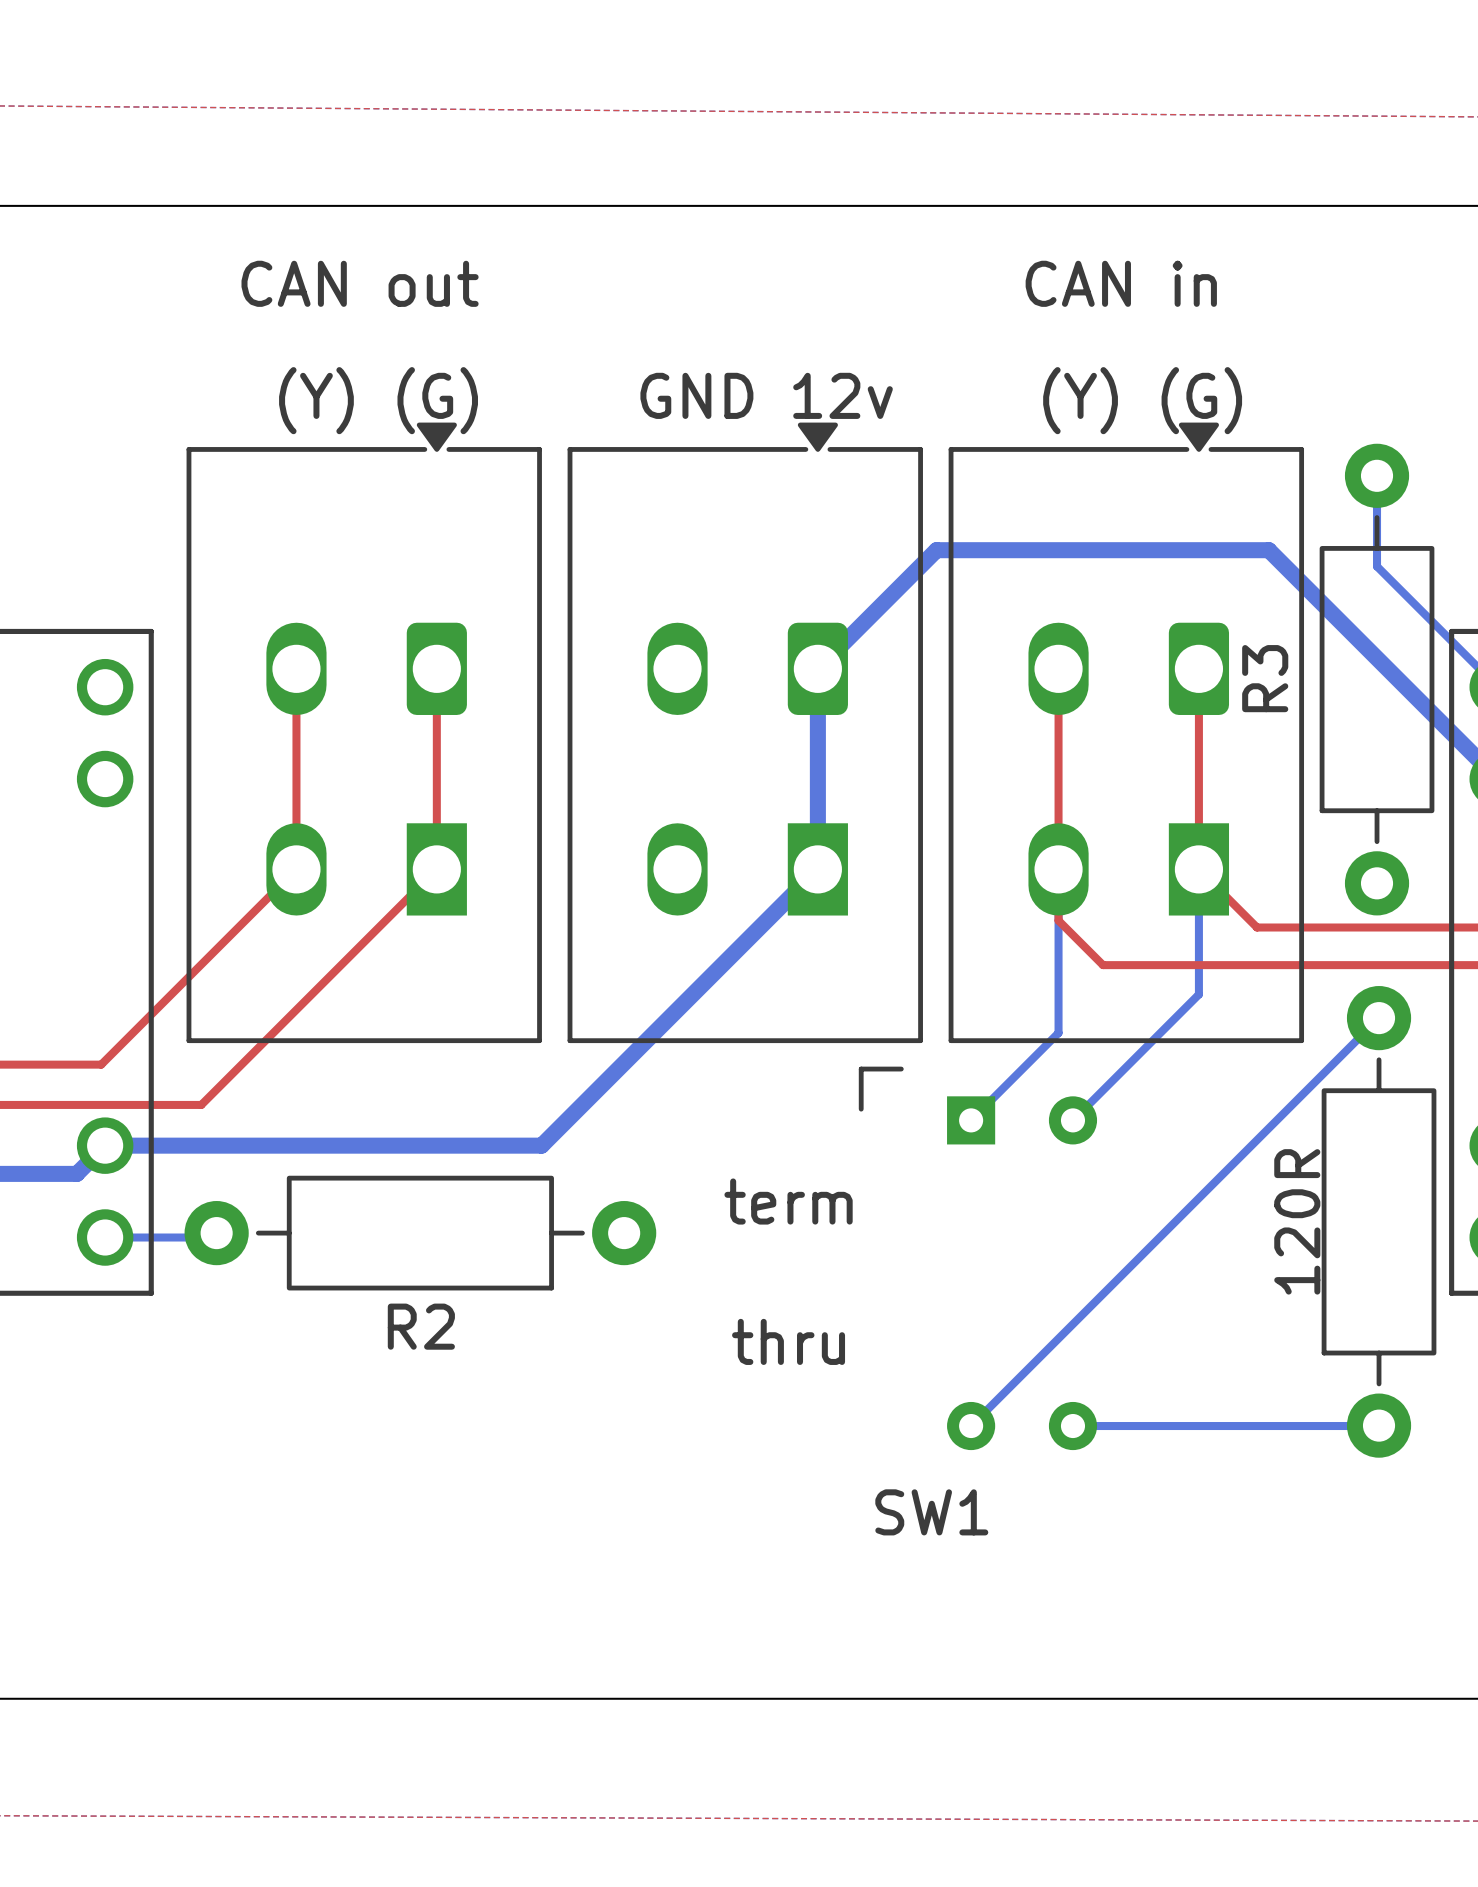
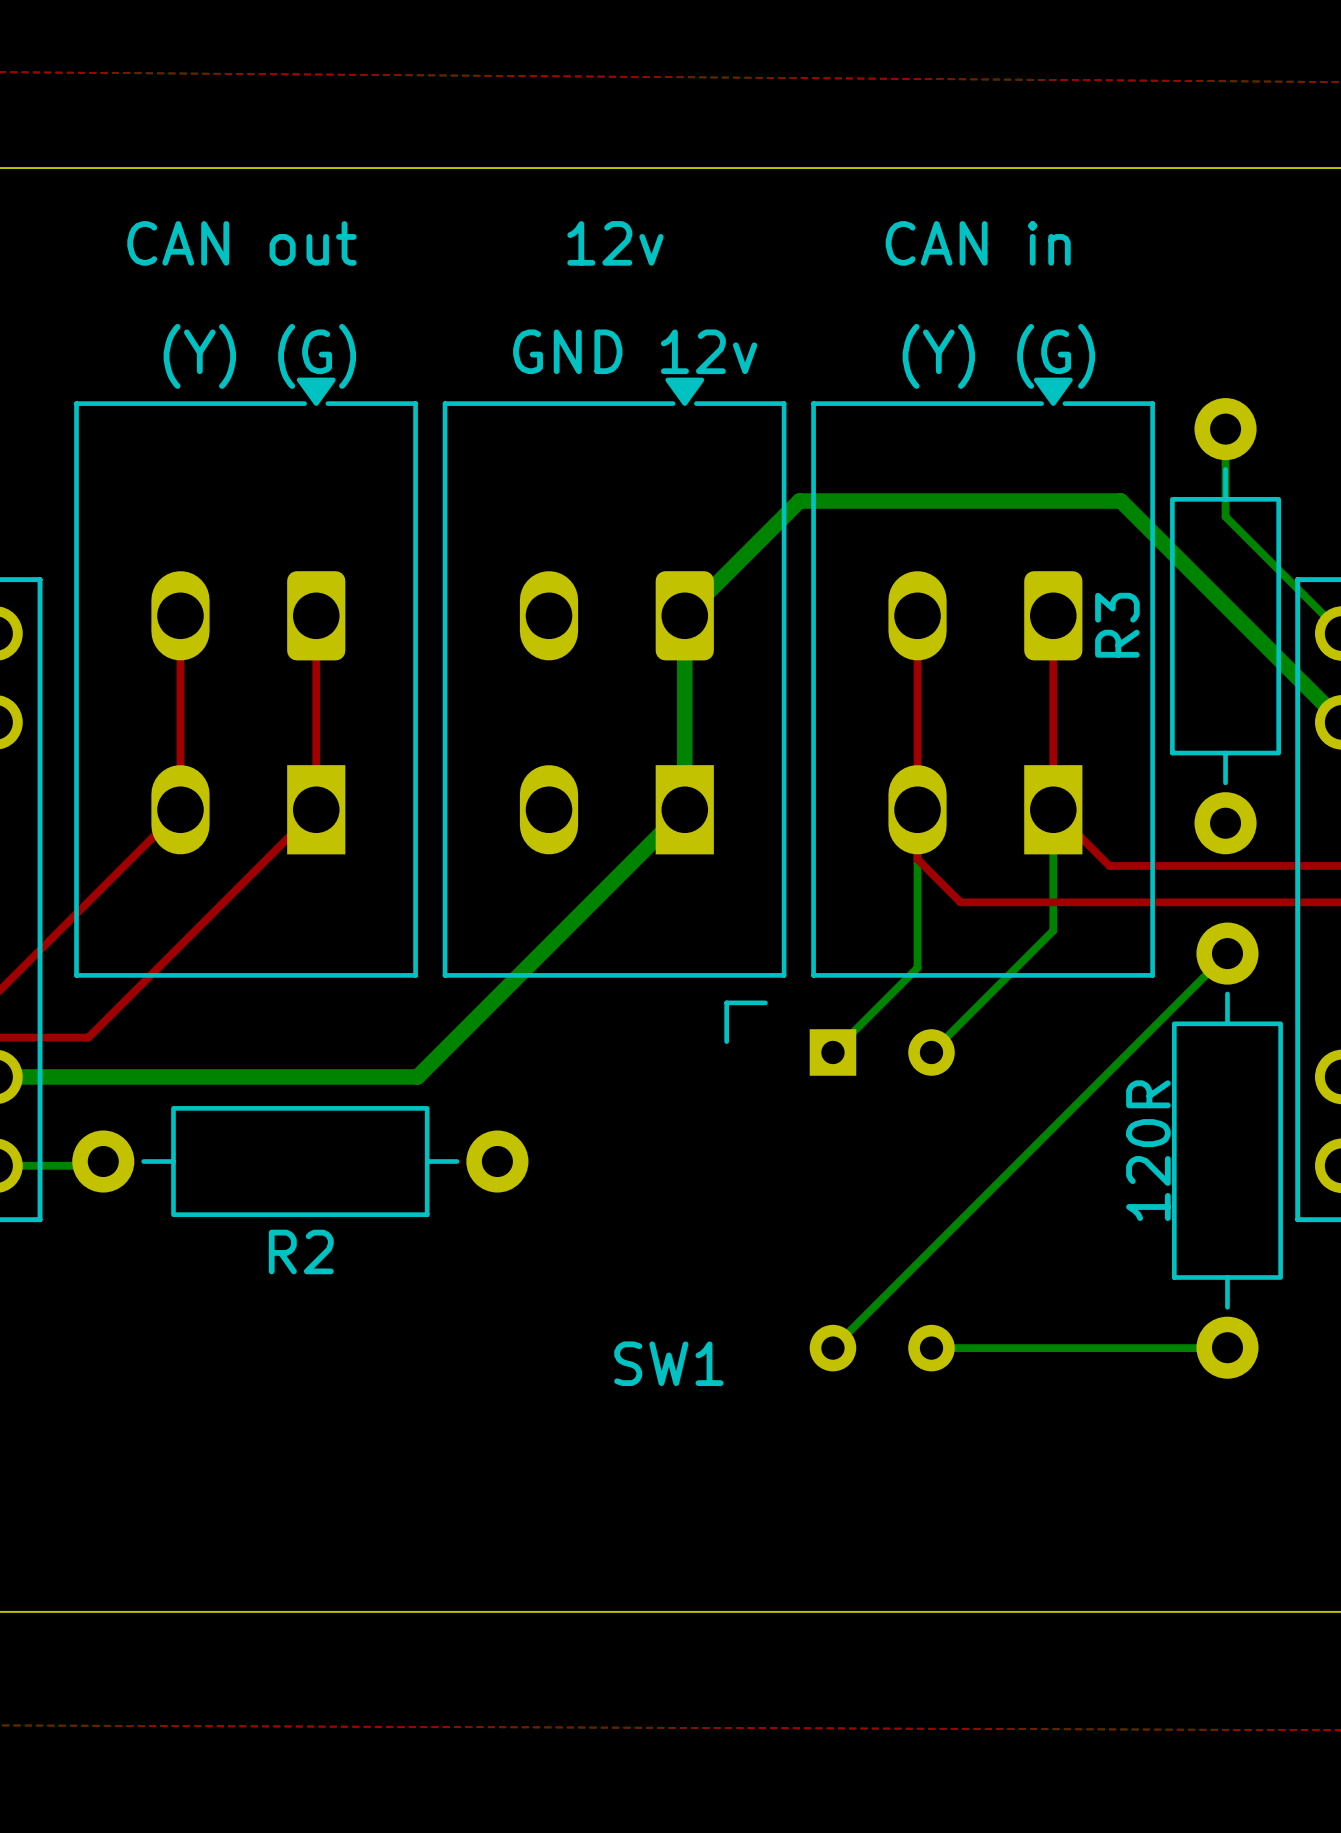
text: none -> 12v (615, 243)
text: term (788, 1201) -> none
text: thru (788, 1341) -> none
SW1 name position: SW1 (931, 1512) -> SW1 (668, 1363)

